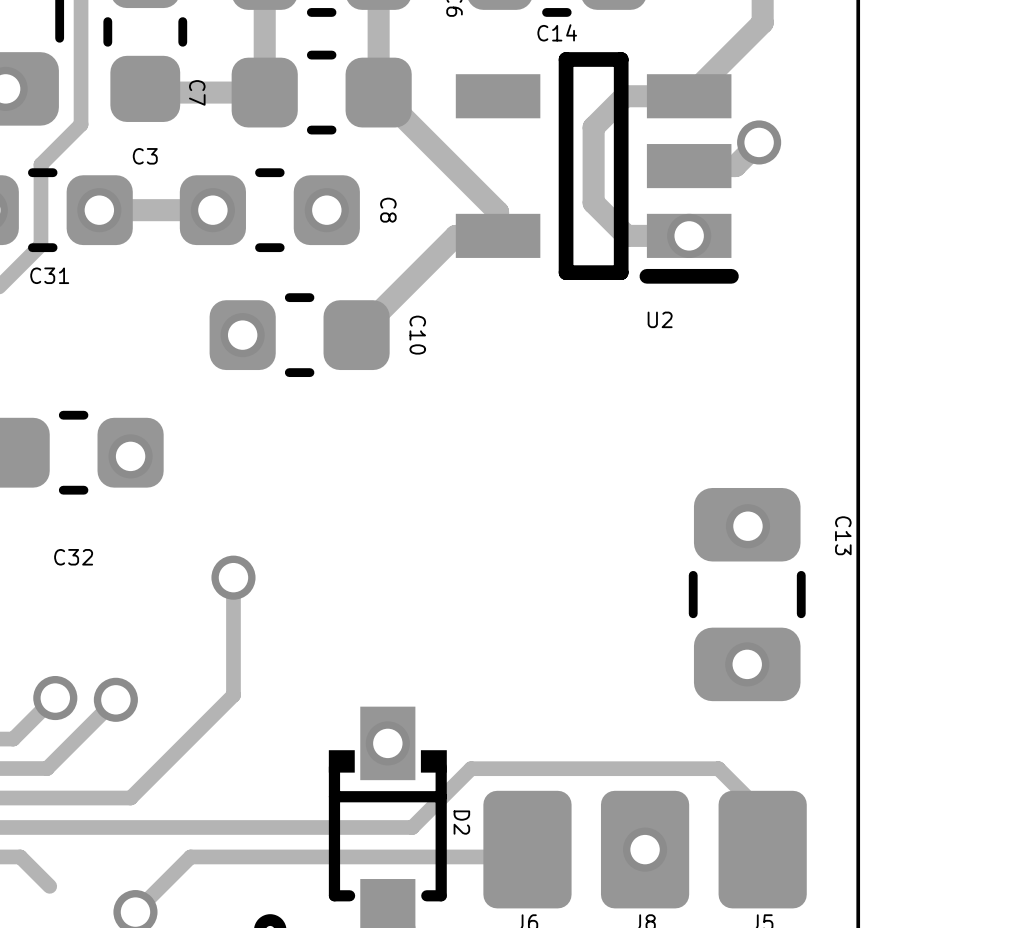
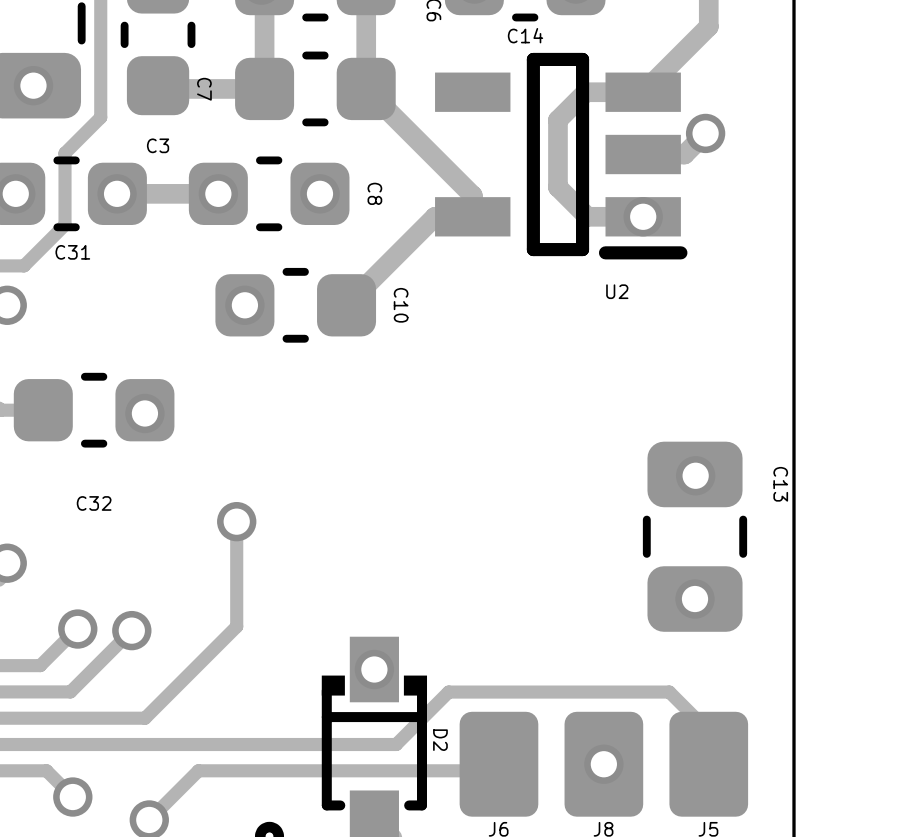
via: none -> (72, 797)

